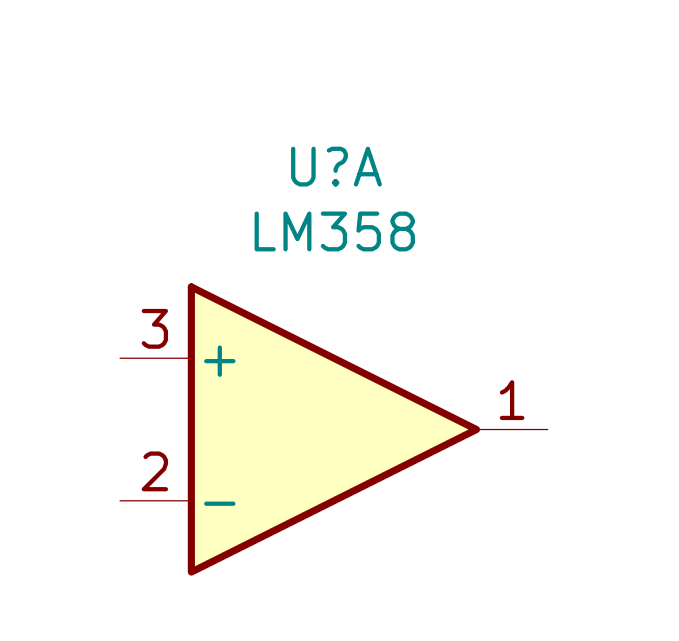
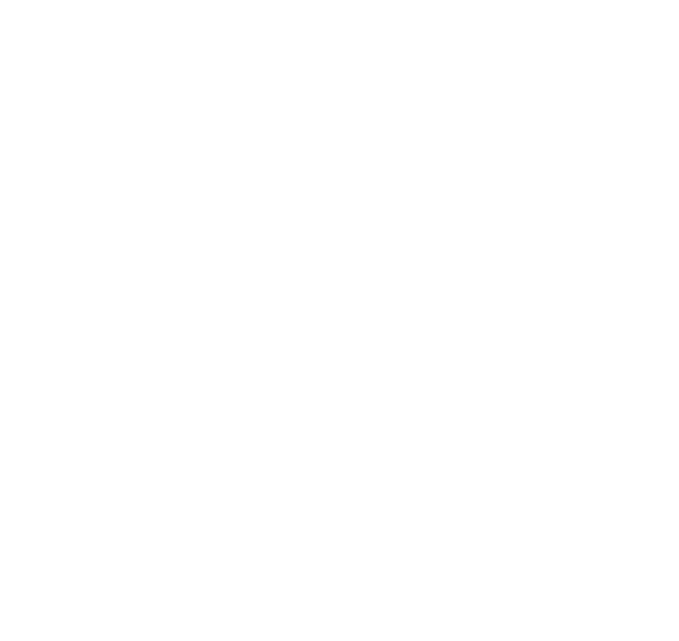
U?A: LM358 (333, 429) -> none

